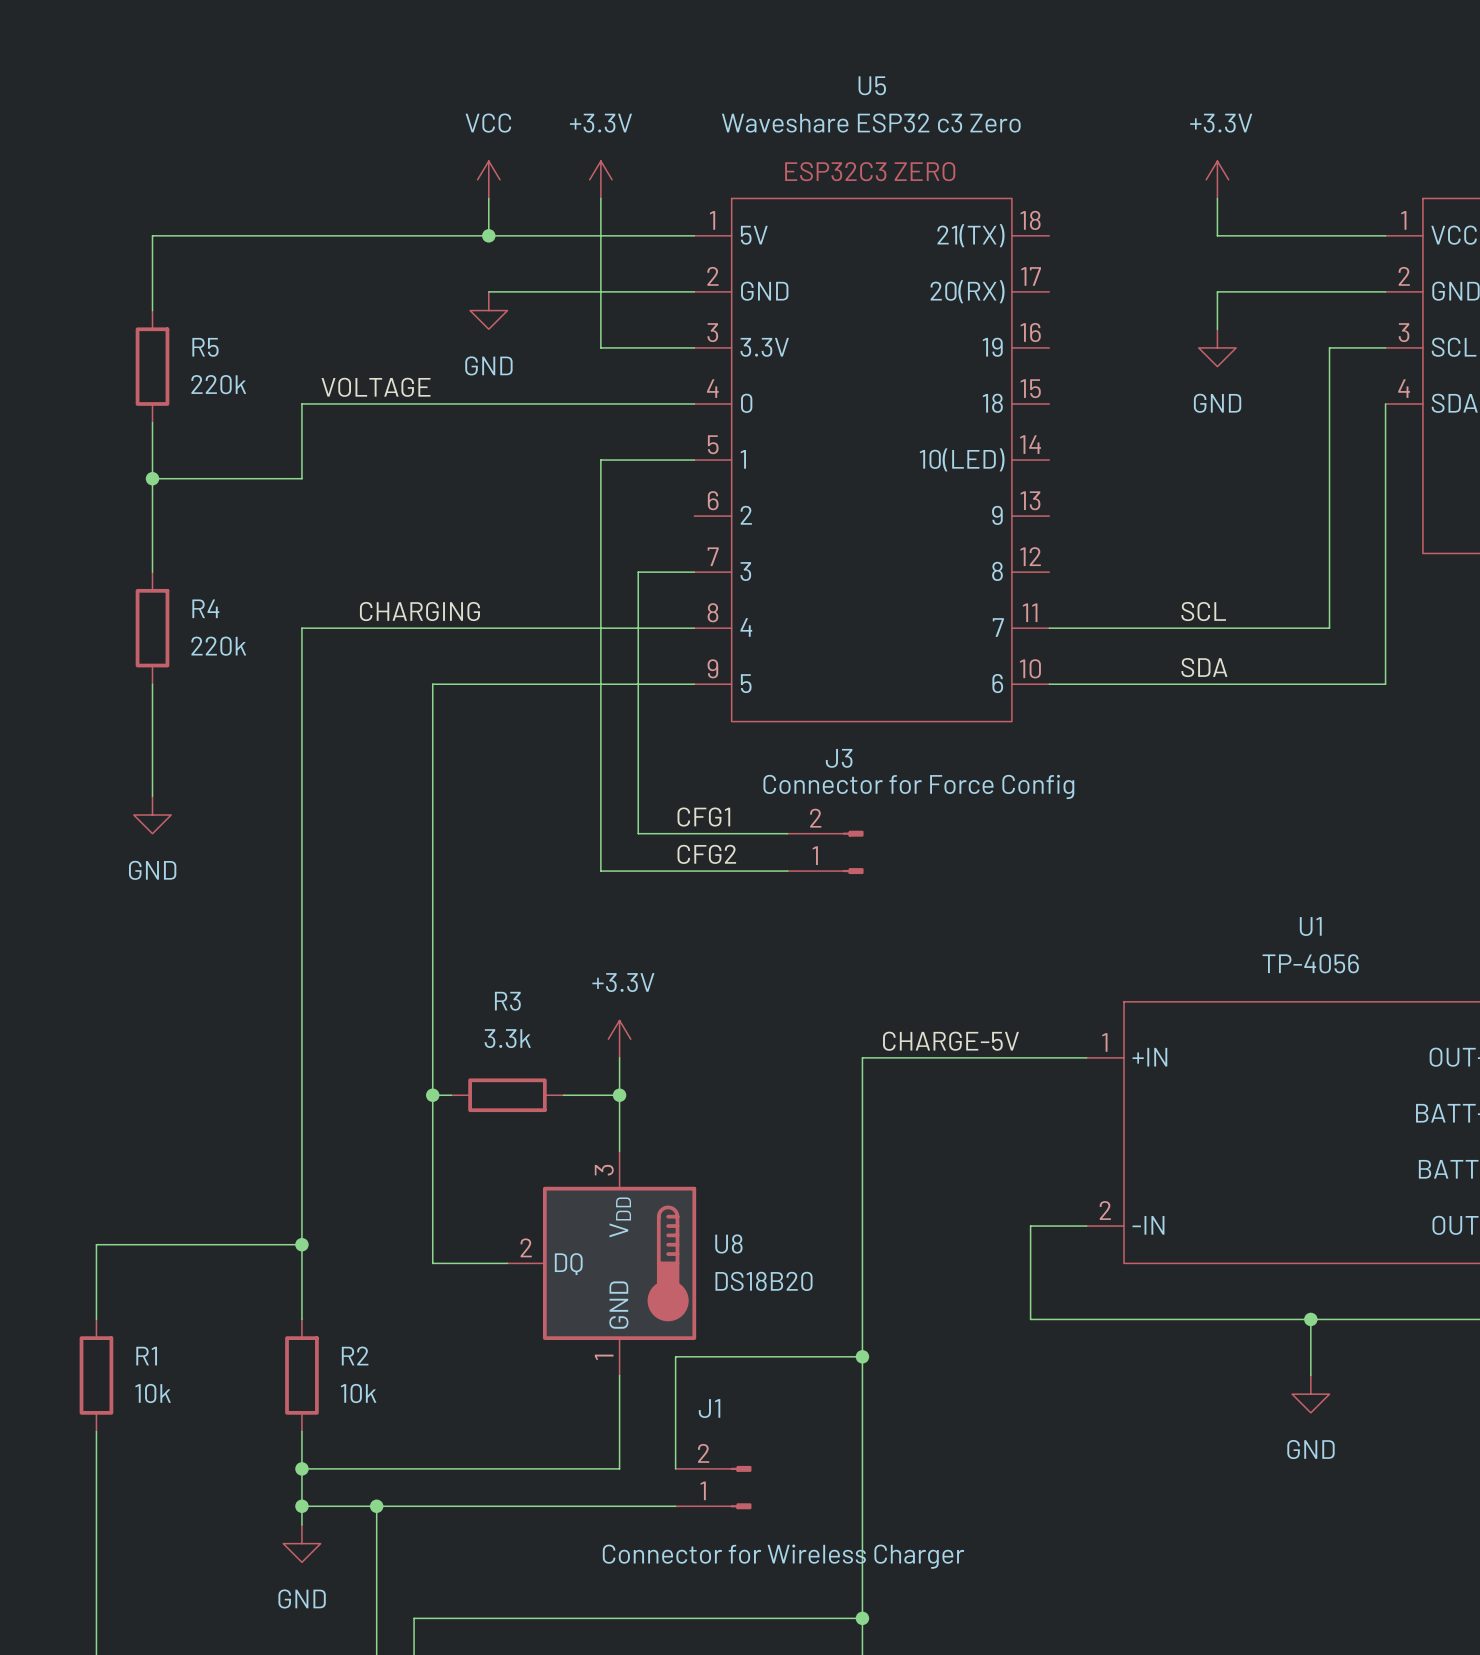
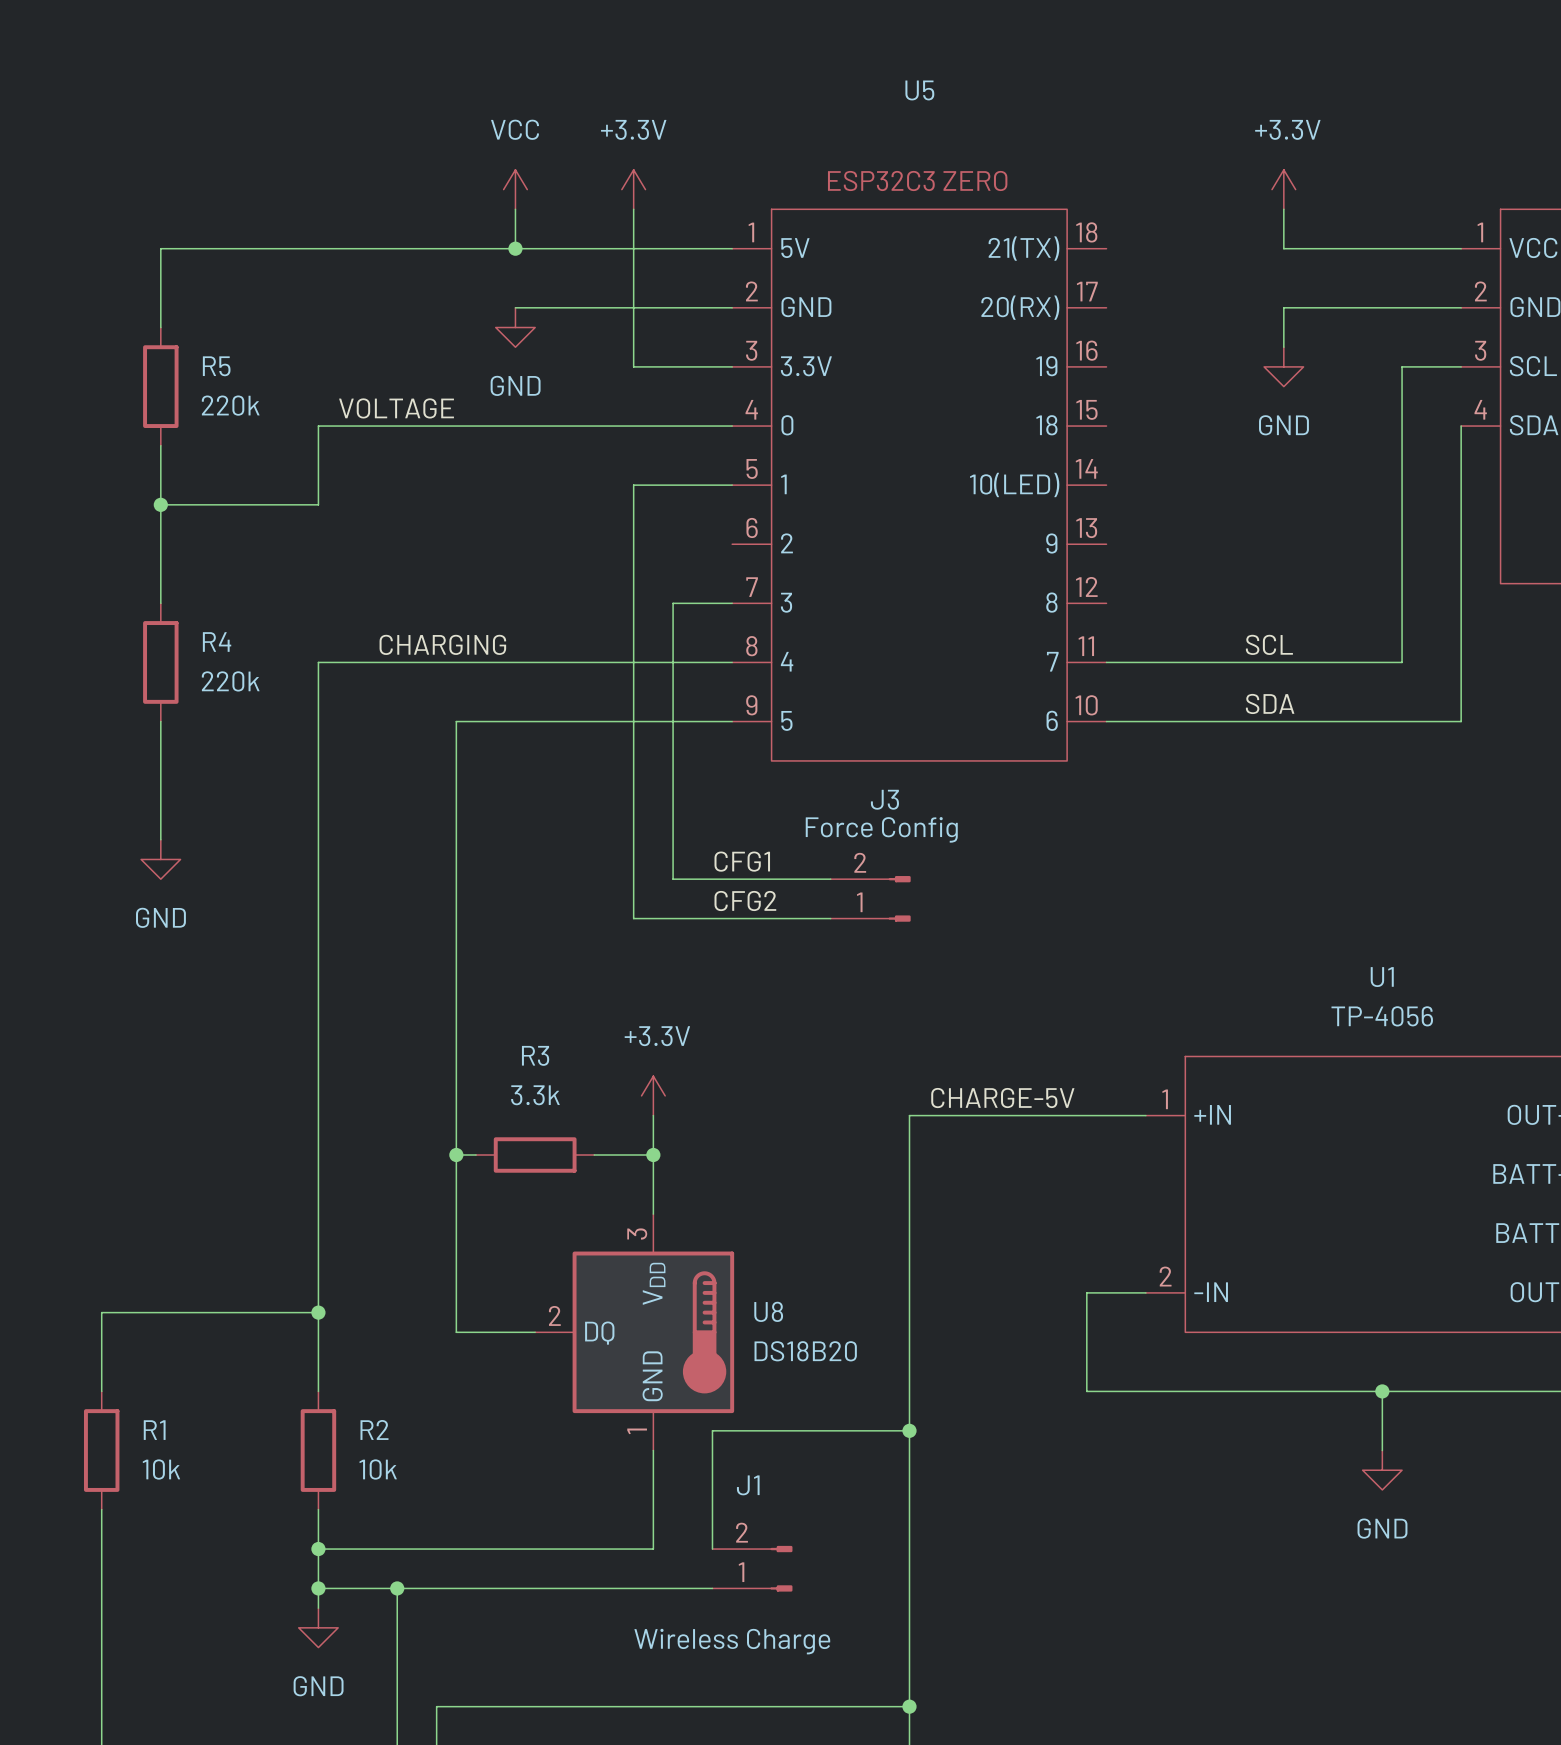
U5 value: Waveshare ESP32 c3 Zero (871, 123) -> none
J3 value: Connector for Force Config (918, 786) -> Force Config (881, 829)
J1 value: Connector for Wireless Charger (783, 1556) -> Wireless Charge (732, 1641)

